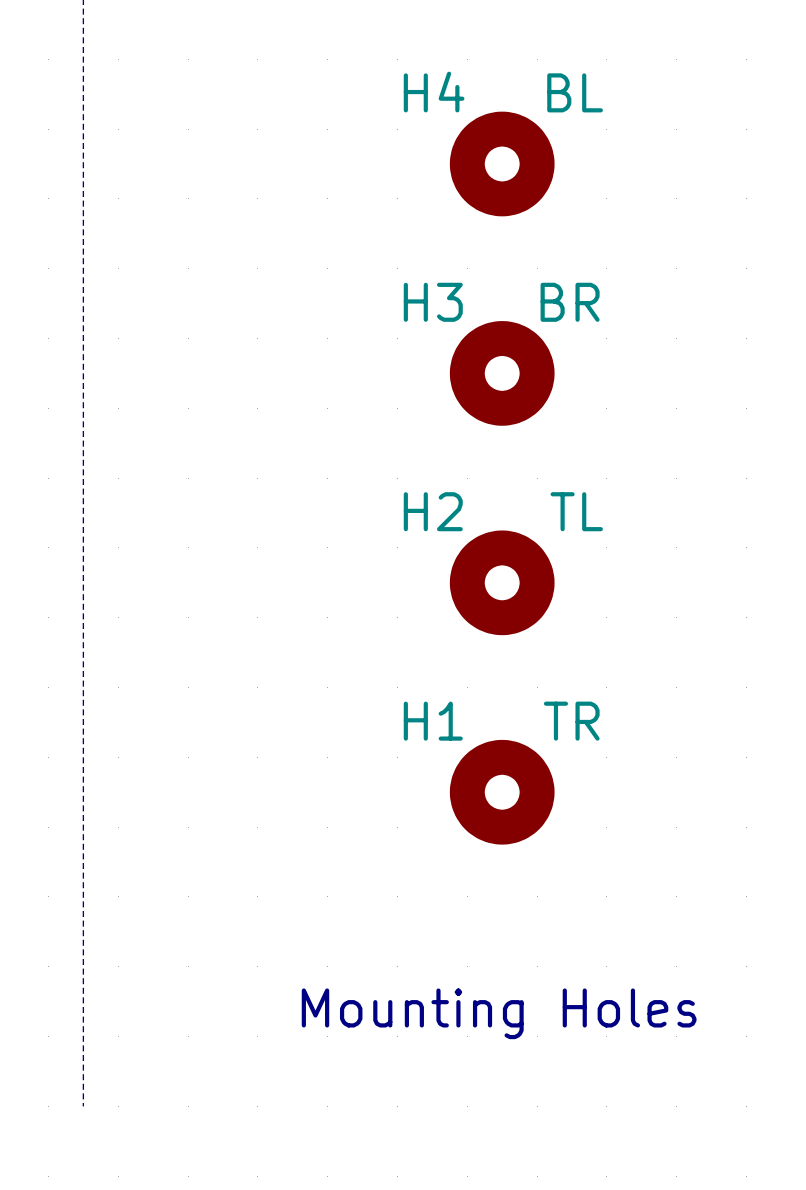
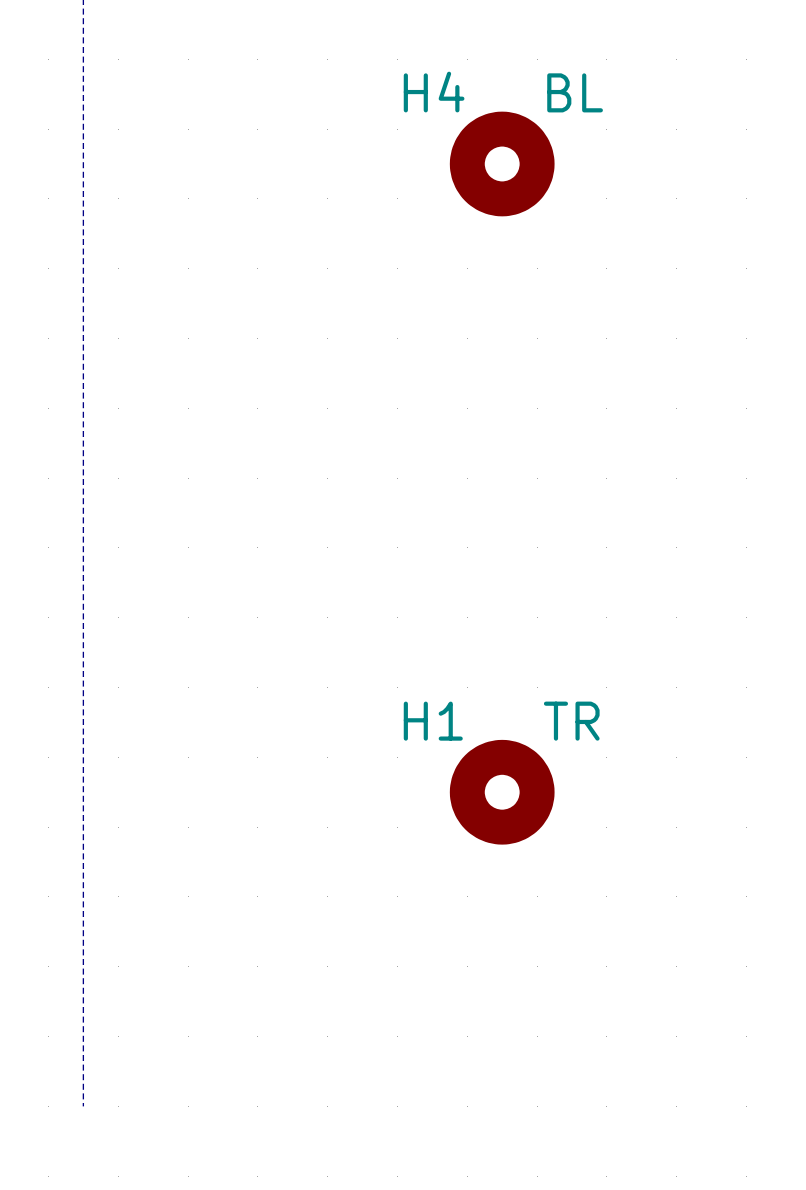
H3: BR (502, 373) -> none
H2: TL (502, 582) -> none
text: Mounting Holes (499, 1013) -> none

